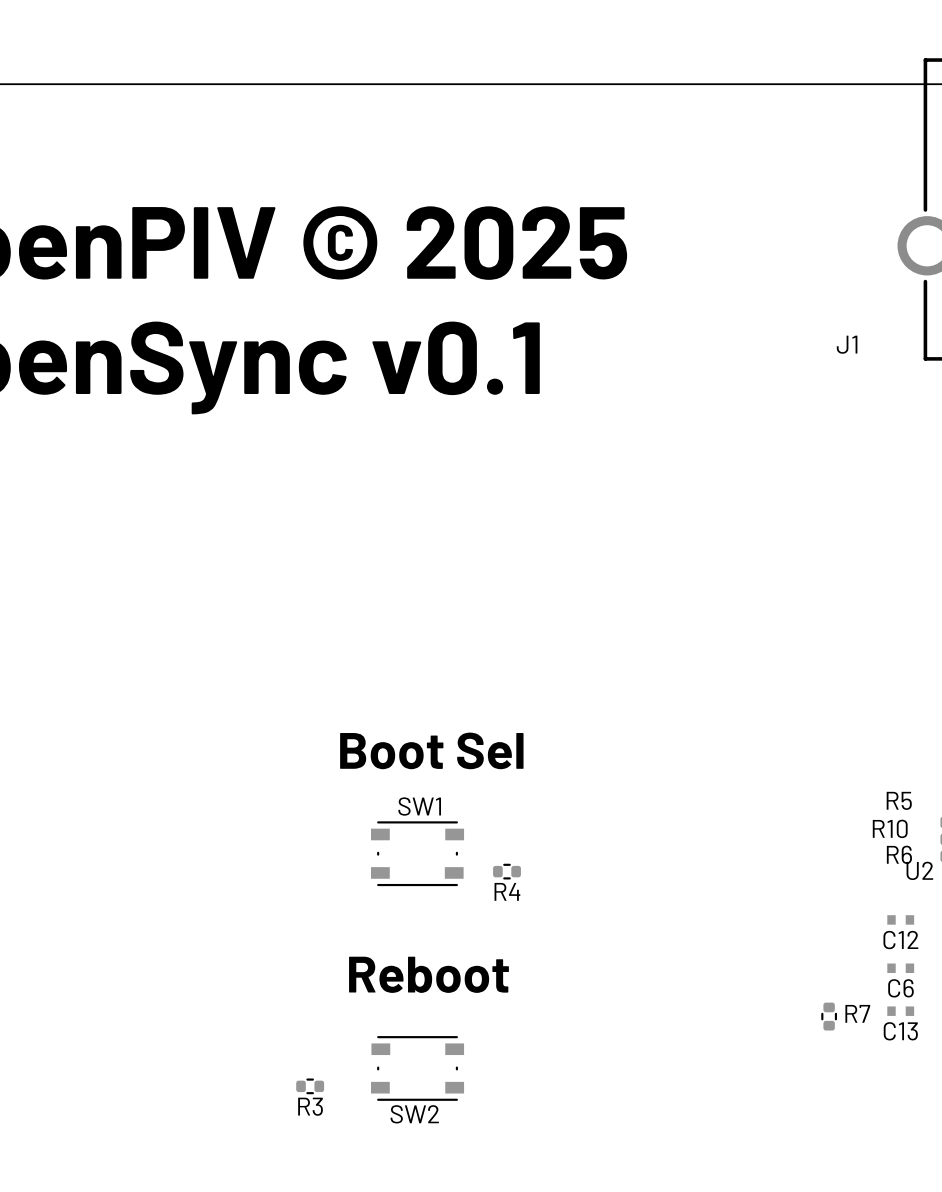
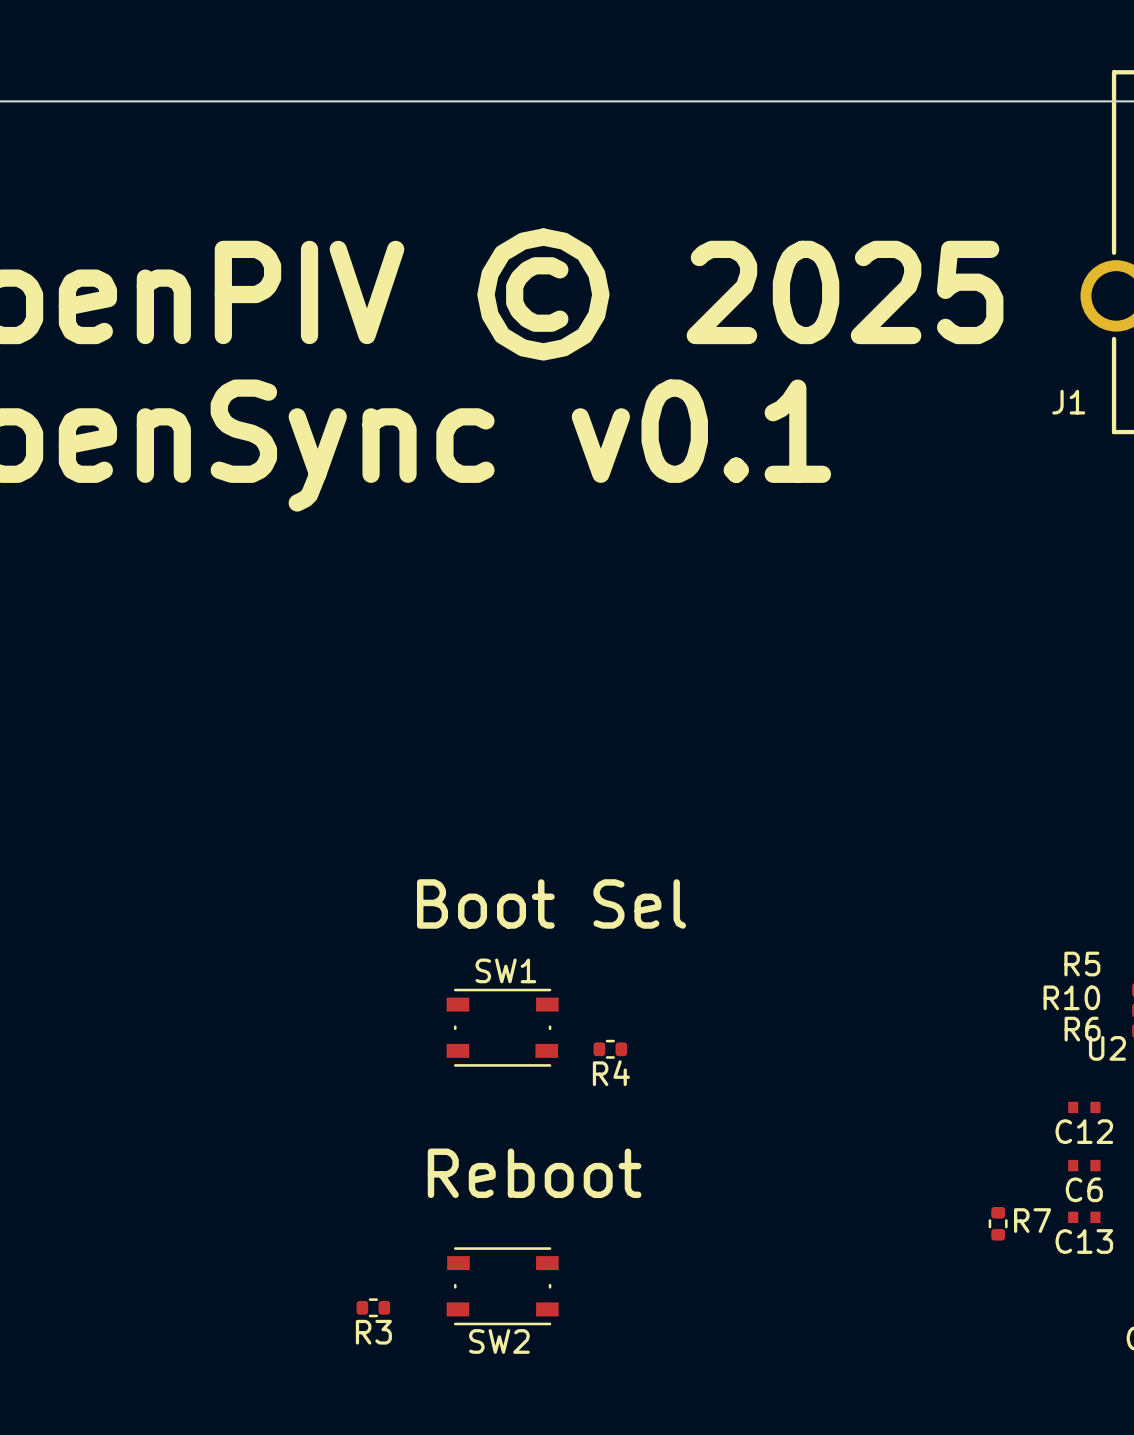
J1 name position: J1 (847, 344) -> J1 (1068, 402)

